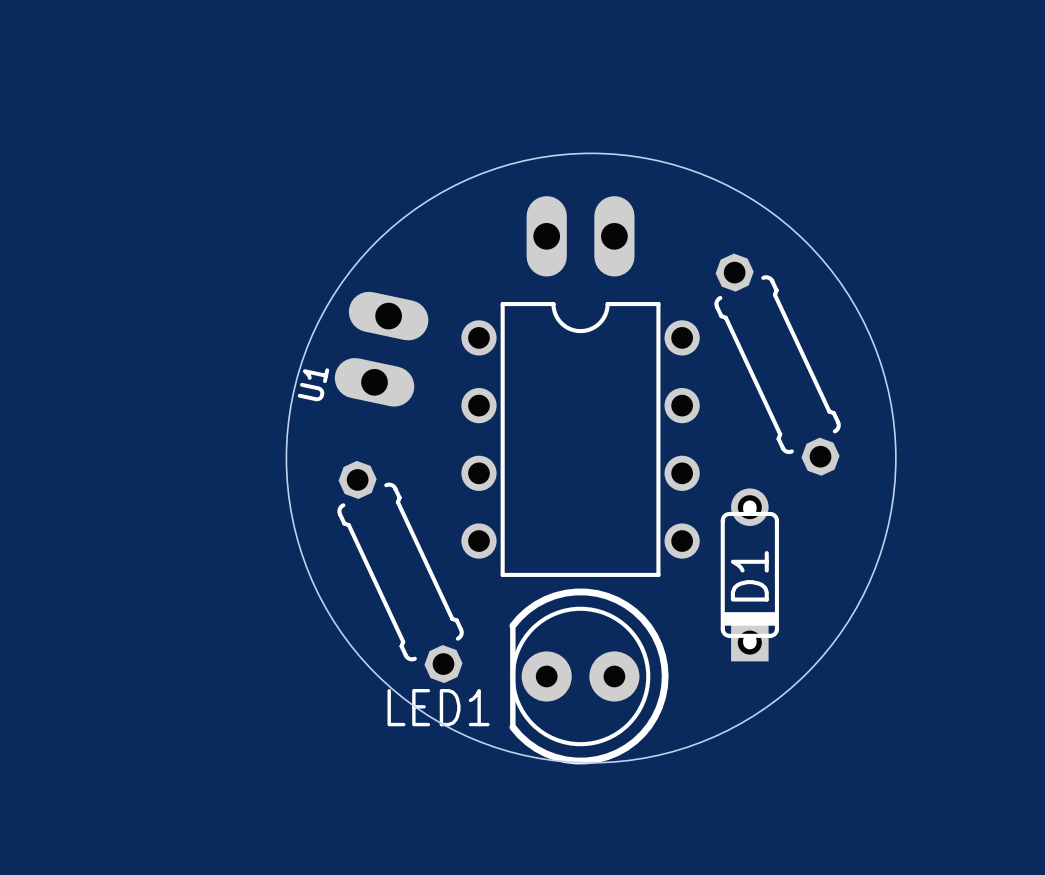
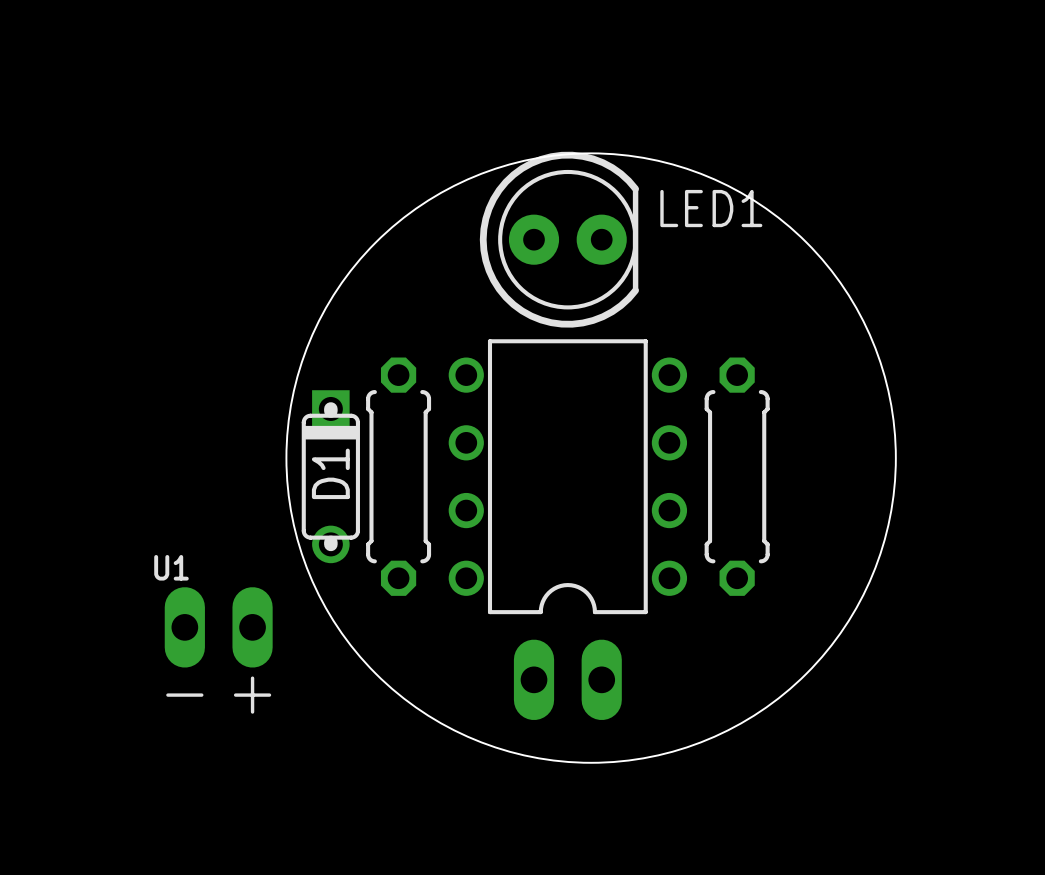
part position: (580, 236) -> (567, 679)
U1 footprint: [334, 291, 429, 407] -> [164, 587, 273, 714]
part: (777, 364) -> none
U1 name position: U1 (313, 384) -> U1 (171, 567)
part rotation: 0° (580, 439) -> 180° (567, 476)
part: none -> (398, 476)
part: none -> (737, 476)
part: (400, 572) -> none
D1 rotation: 0° (749, 574) -> 180° (330, 476)
D1 position: (749, 574) -> (330, 476)
LED1 rotation: 0° (589, 676) -> 180° (559, 239)
LED1 position: (589, 676) -> (559, 239)

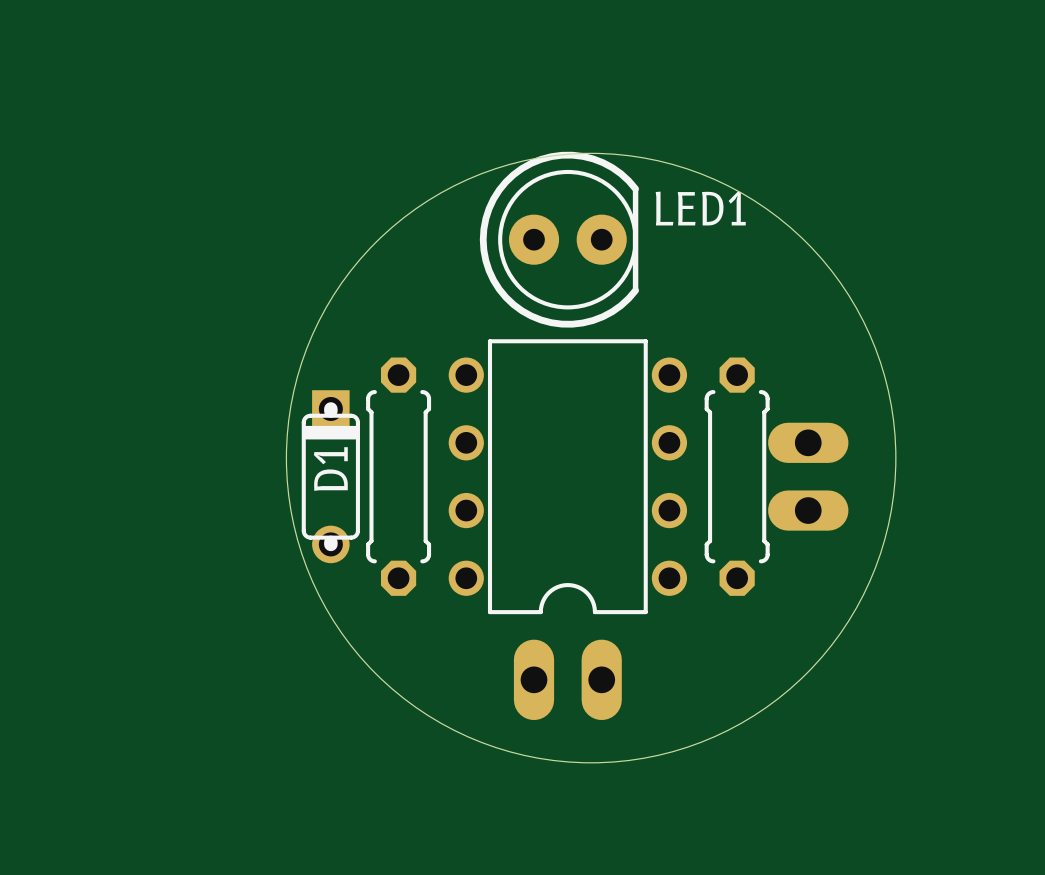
part: none -> (808, 476)
U1: (218, 650) -> none

